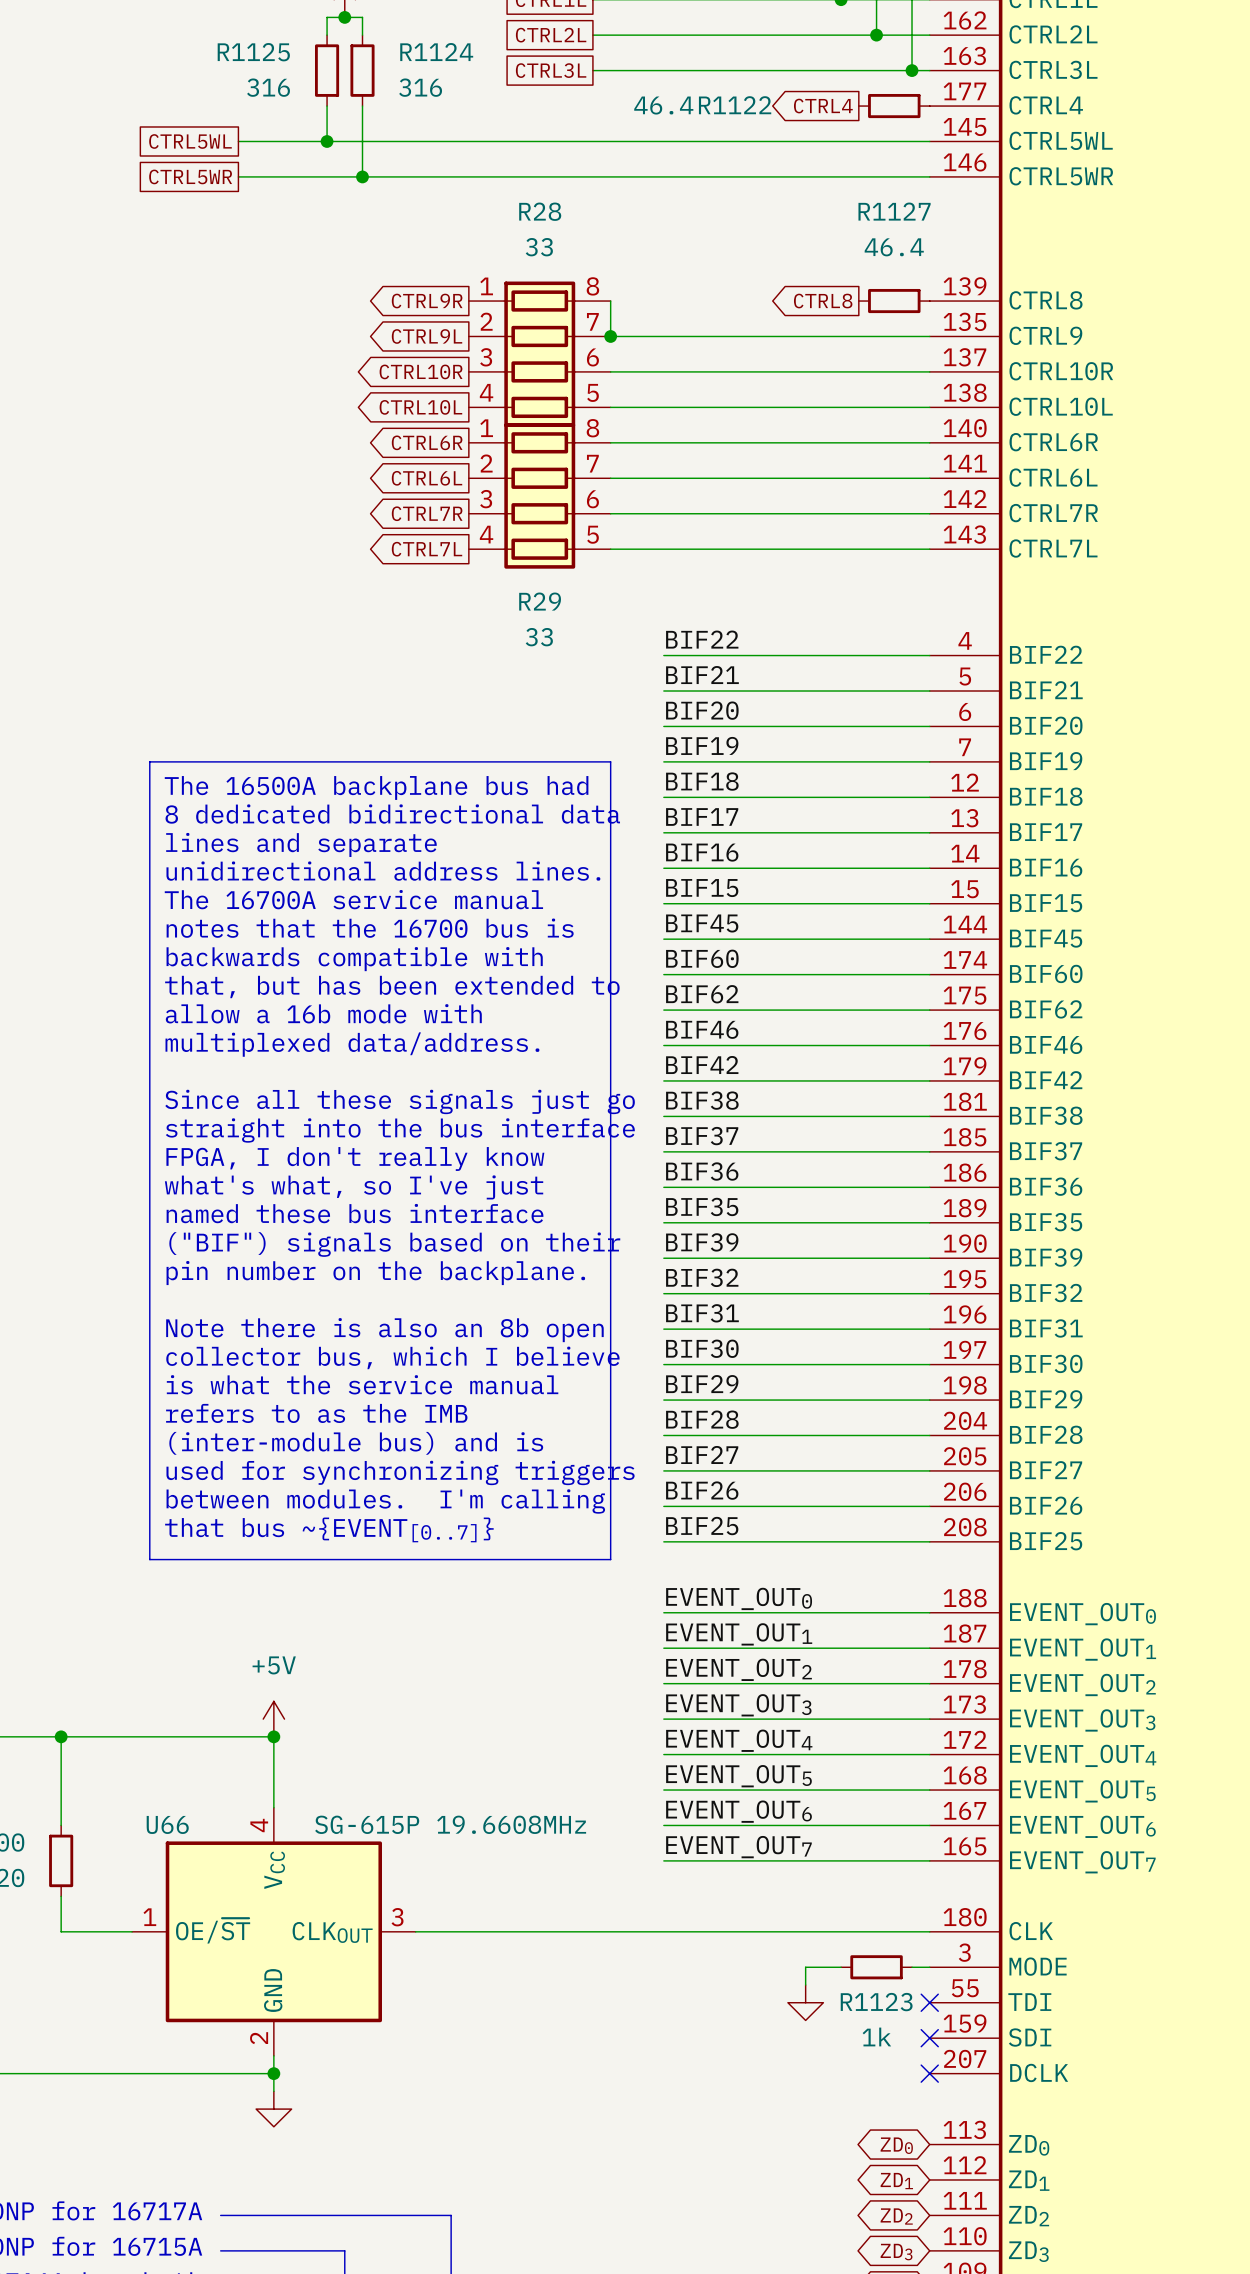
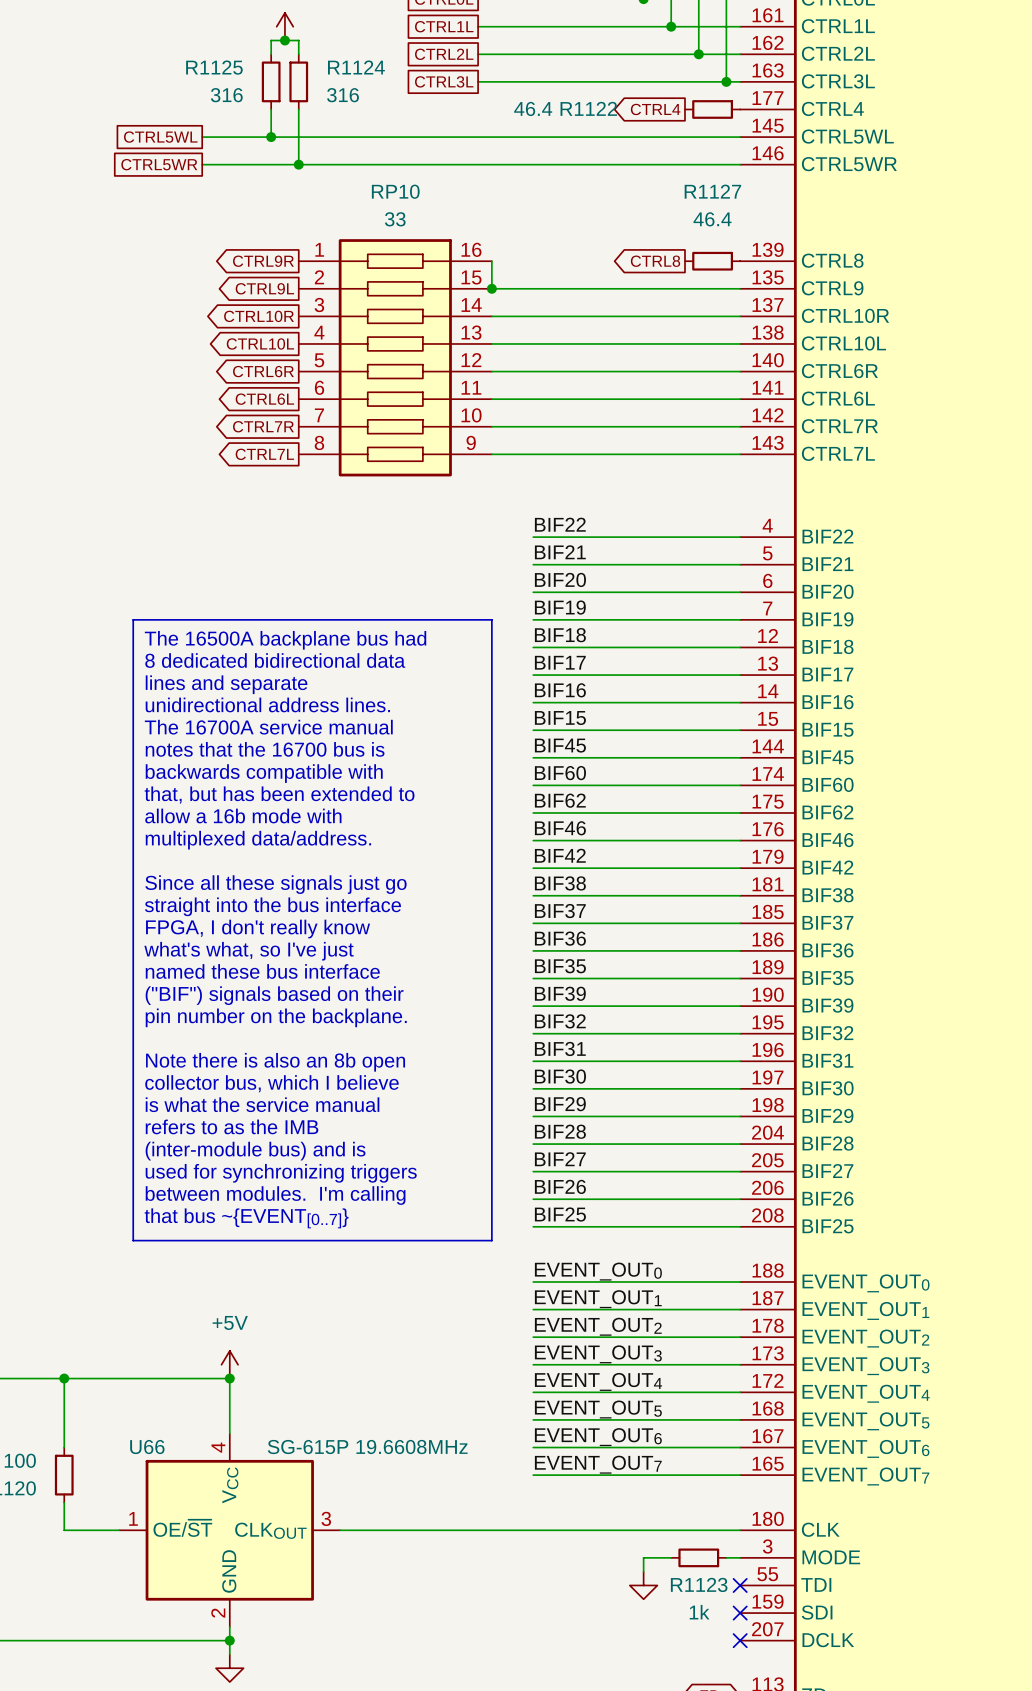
global label position: CTRL9R (427, 301) -> CTRL9R (263, 261)
global label position: CTRL9L (427, 336) -> CTRL9L (264, 288)
R28: 33 (539, 354) -> none
global label position: CTRL10R (421, 371) -> CTRL10R (259, 316)
global label position: CTRL10L (420, 407) -> CTRL10L (260, 343)
RP10: none -> 33 (395, 357)
global label position: CTRL6R (427, 442) -> CTRL6R (263, 371)
global label position: CTRL6L (427, 478) -> CTRL6L (264, 399)
R29: 33 (539, 496) -> none
global label position: CTRL7R (427, 513) -> CTRL7R (263, 426)
global label position: CTRL7L (427, 549) -> CTRL7L (264, 454)

